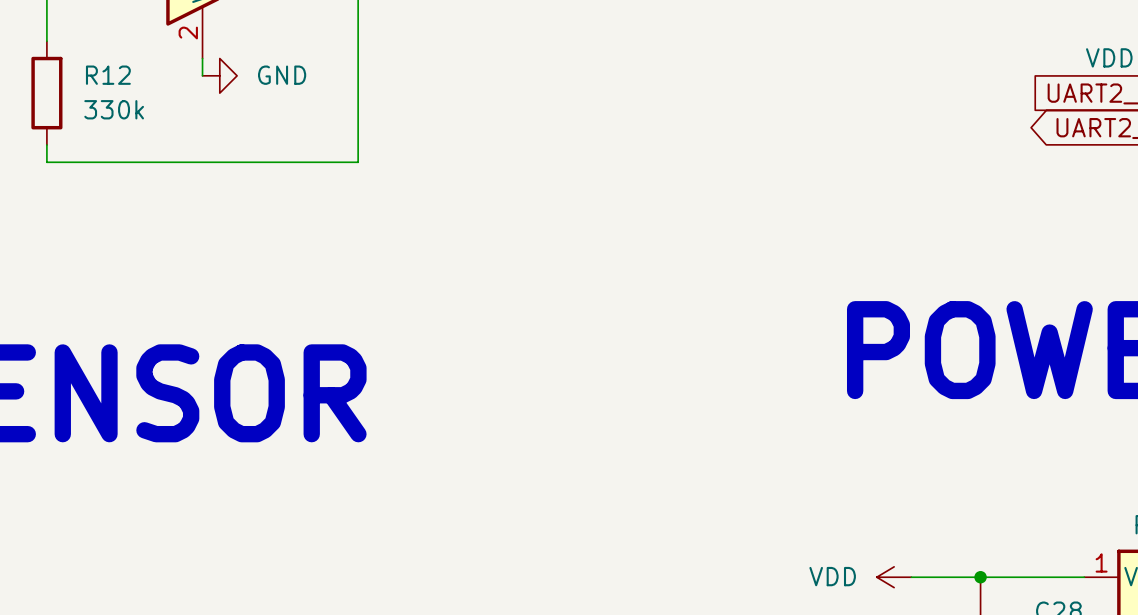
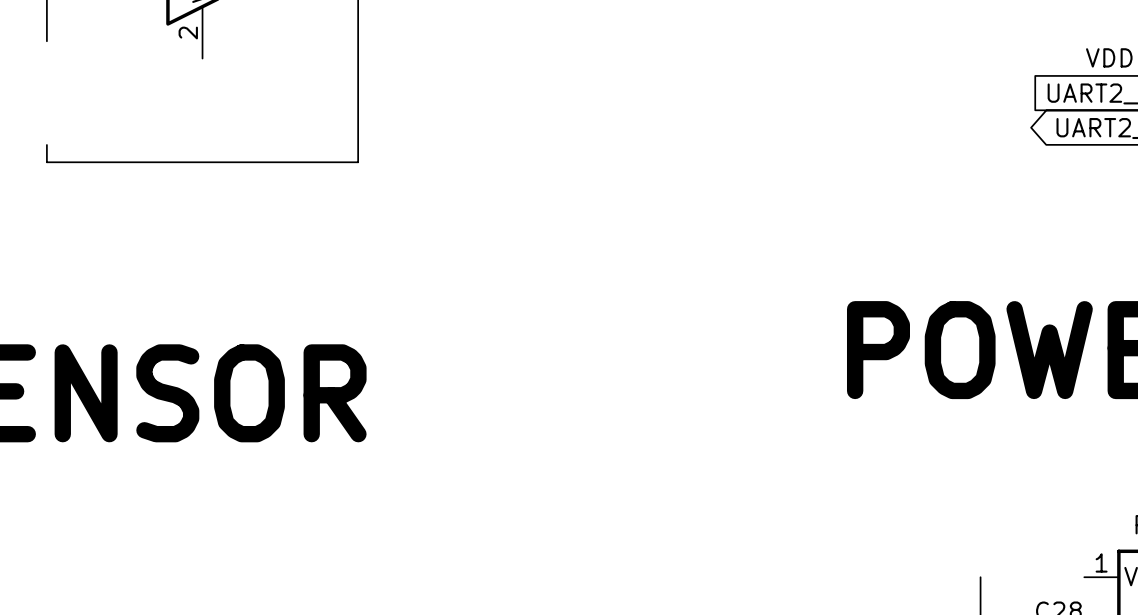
wire: (202, 58) (202, 75) -> none
power symbol: GND (219, 75) -> none
R12: 330k (46, 93) -> none
power symbol: VDD (894, 577) -> none
wire: (911, 577) (1084, 577) -> none
junction: (980, 577) -> none

